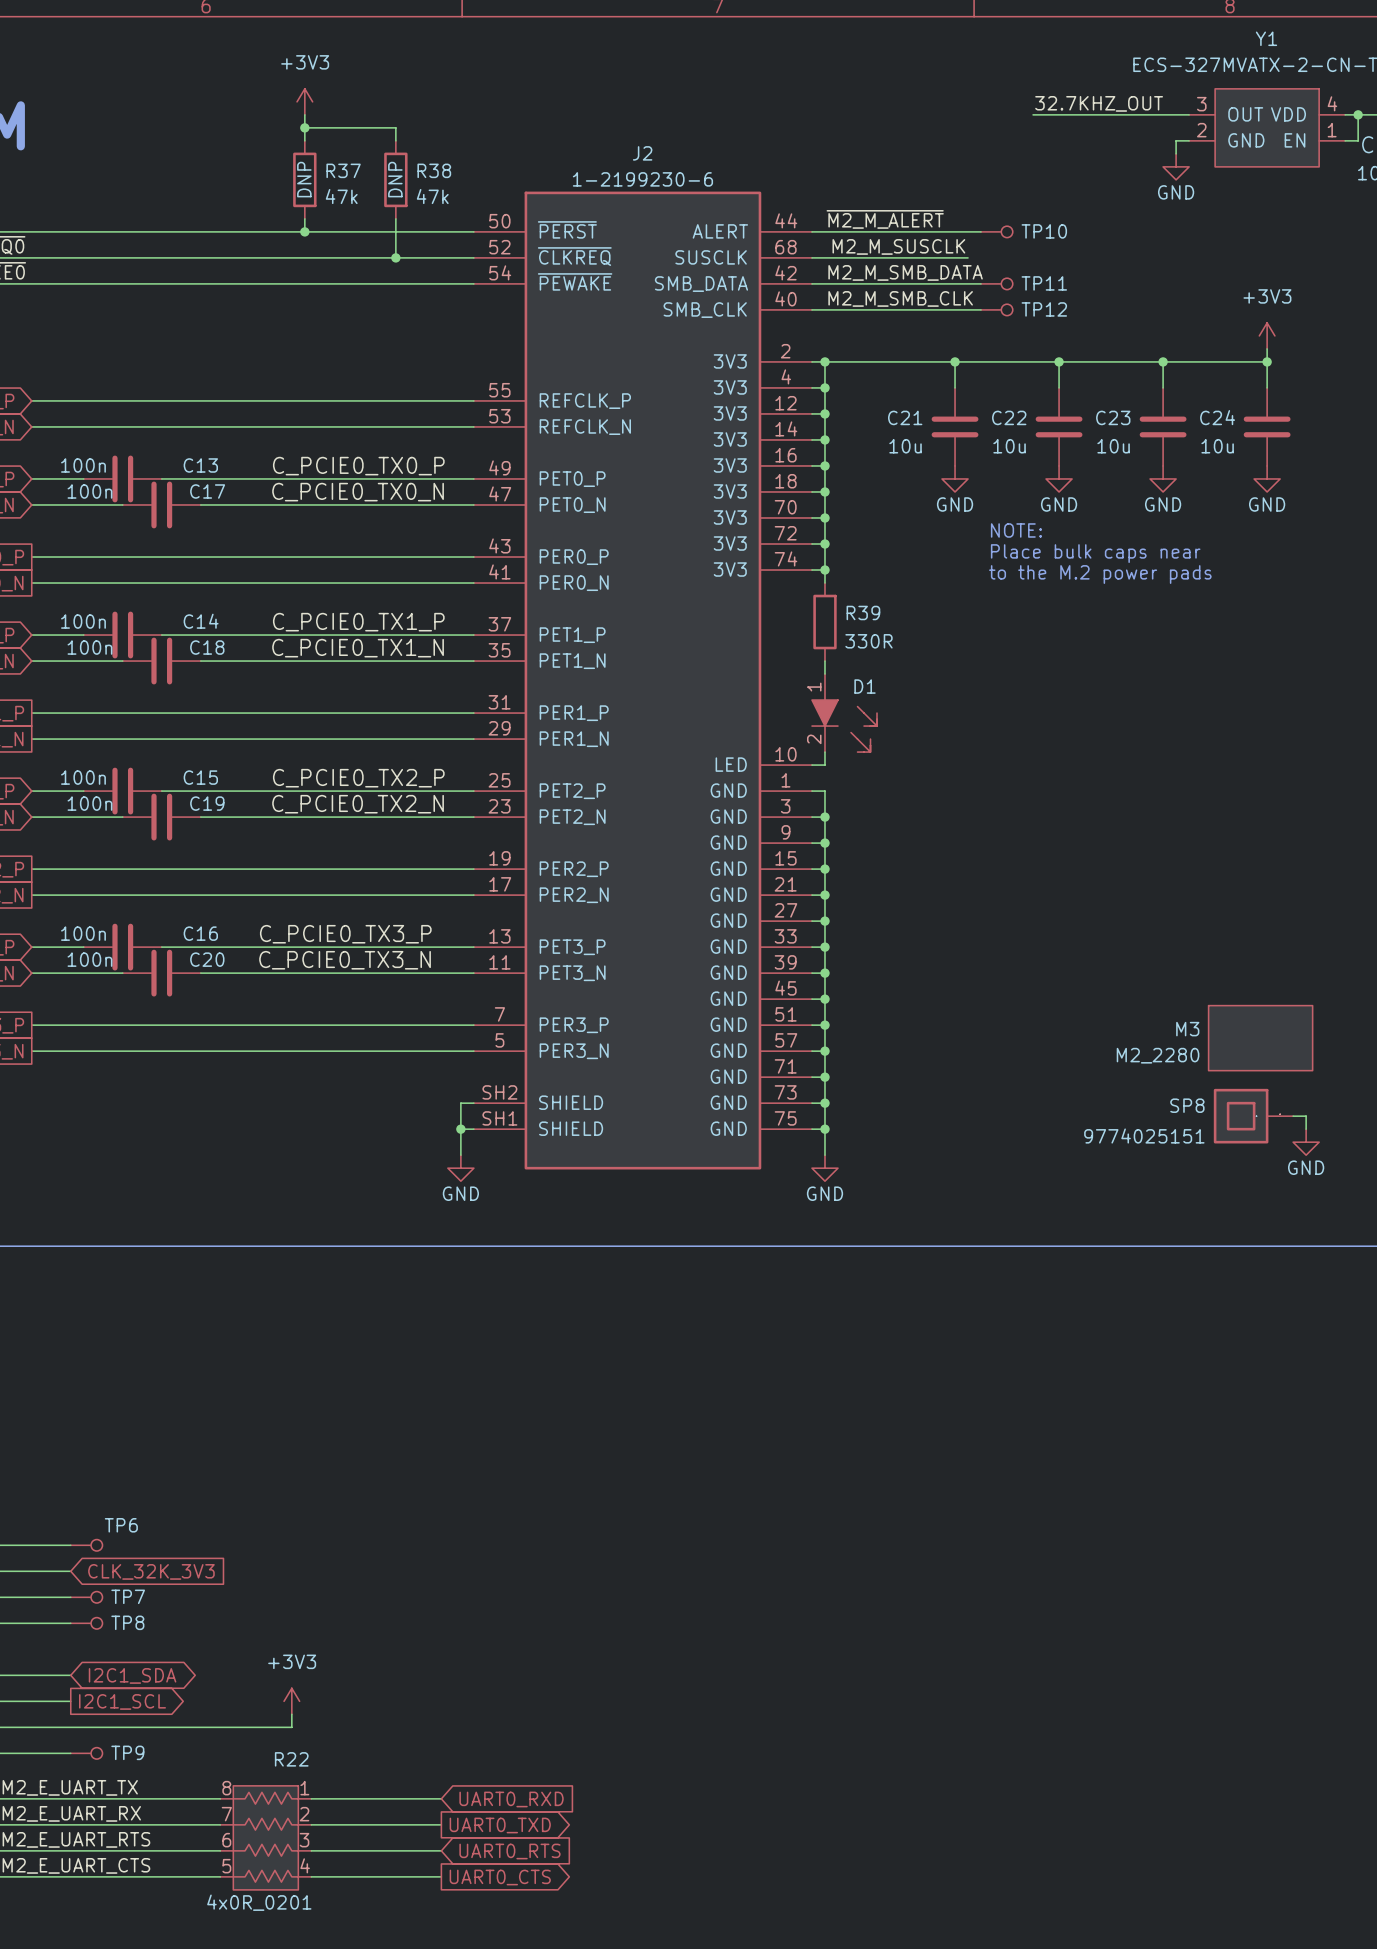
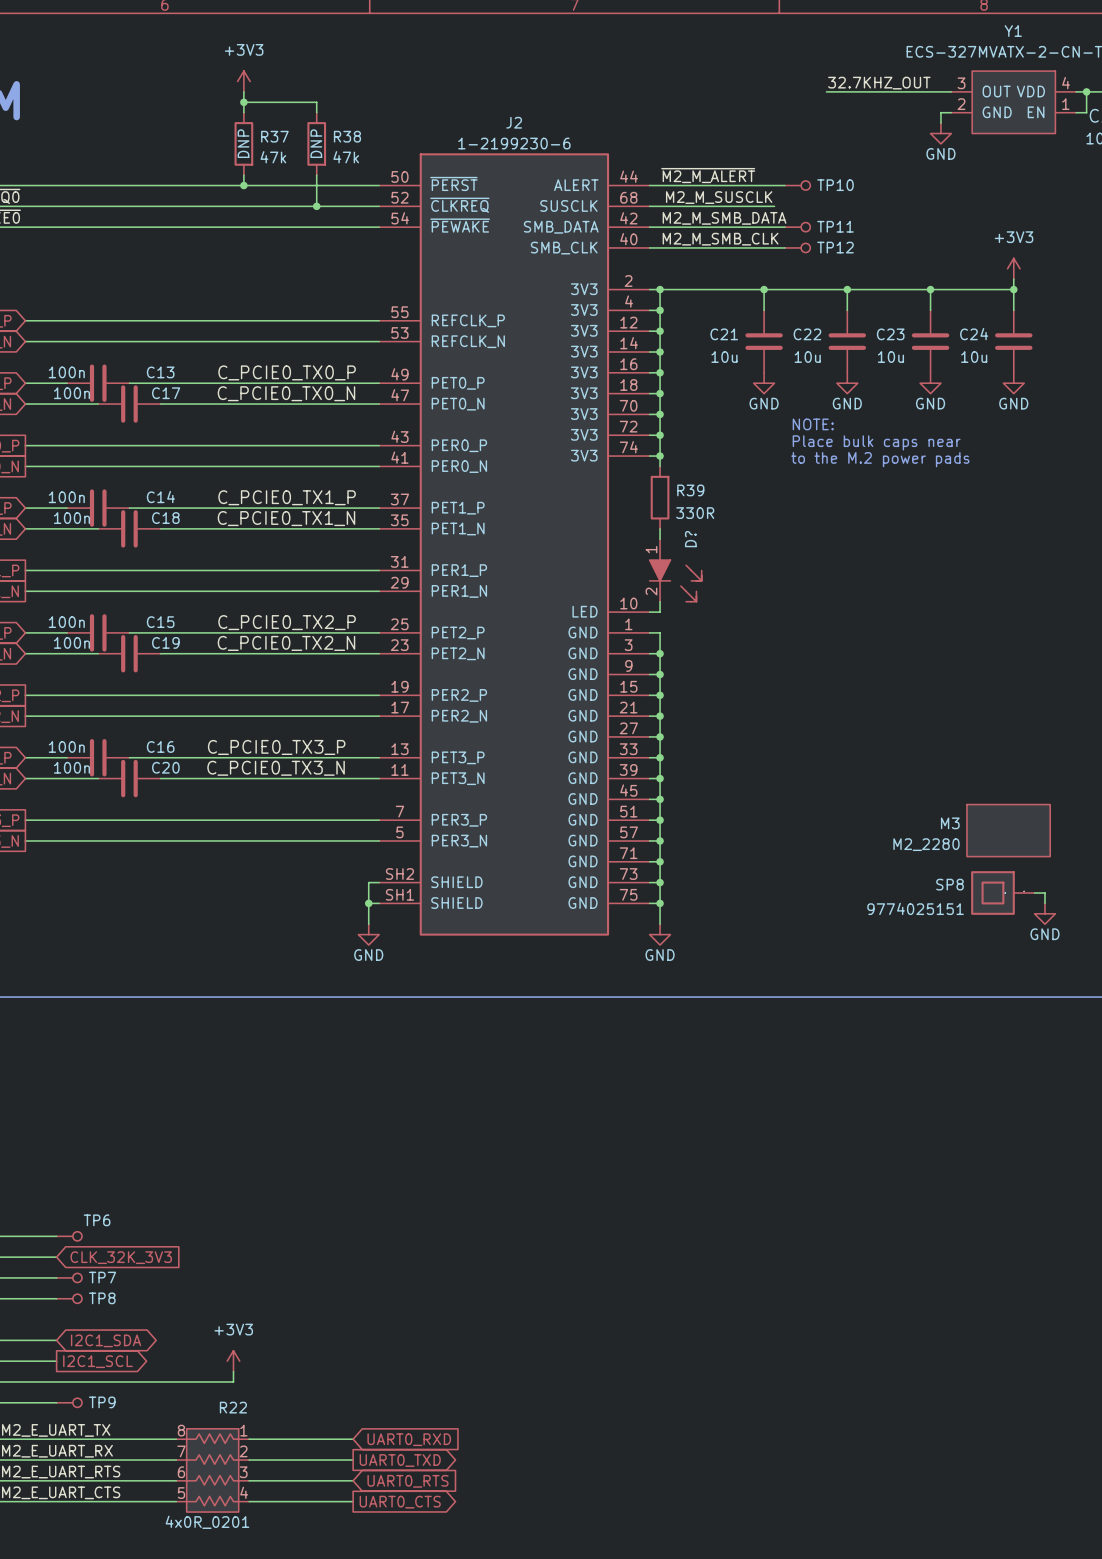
D1 name: D1 (865, 686) -> D? (690, 539)

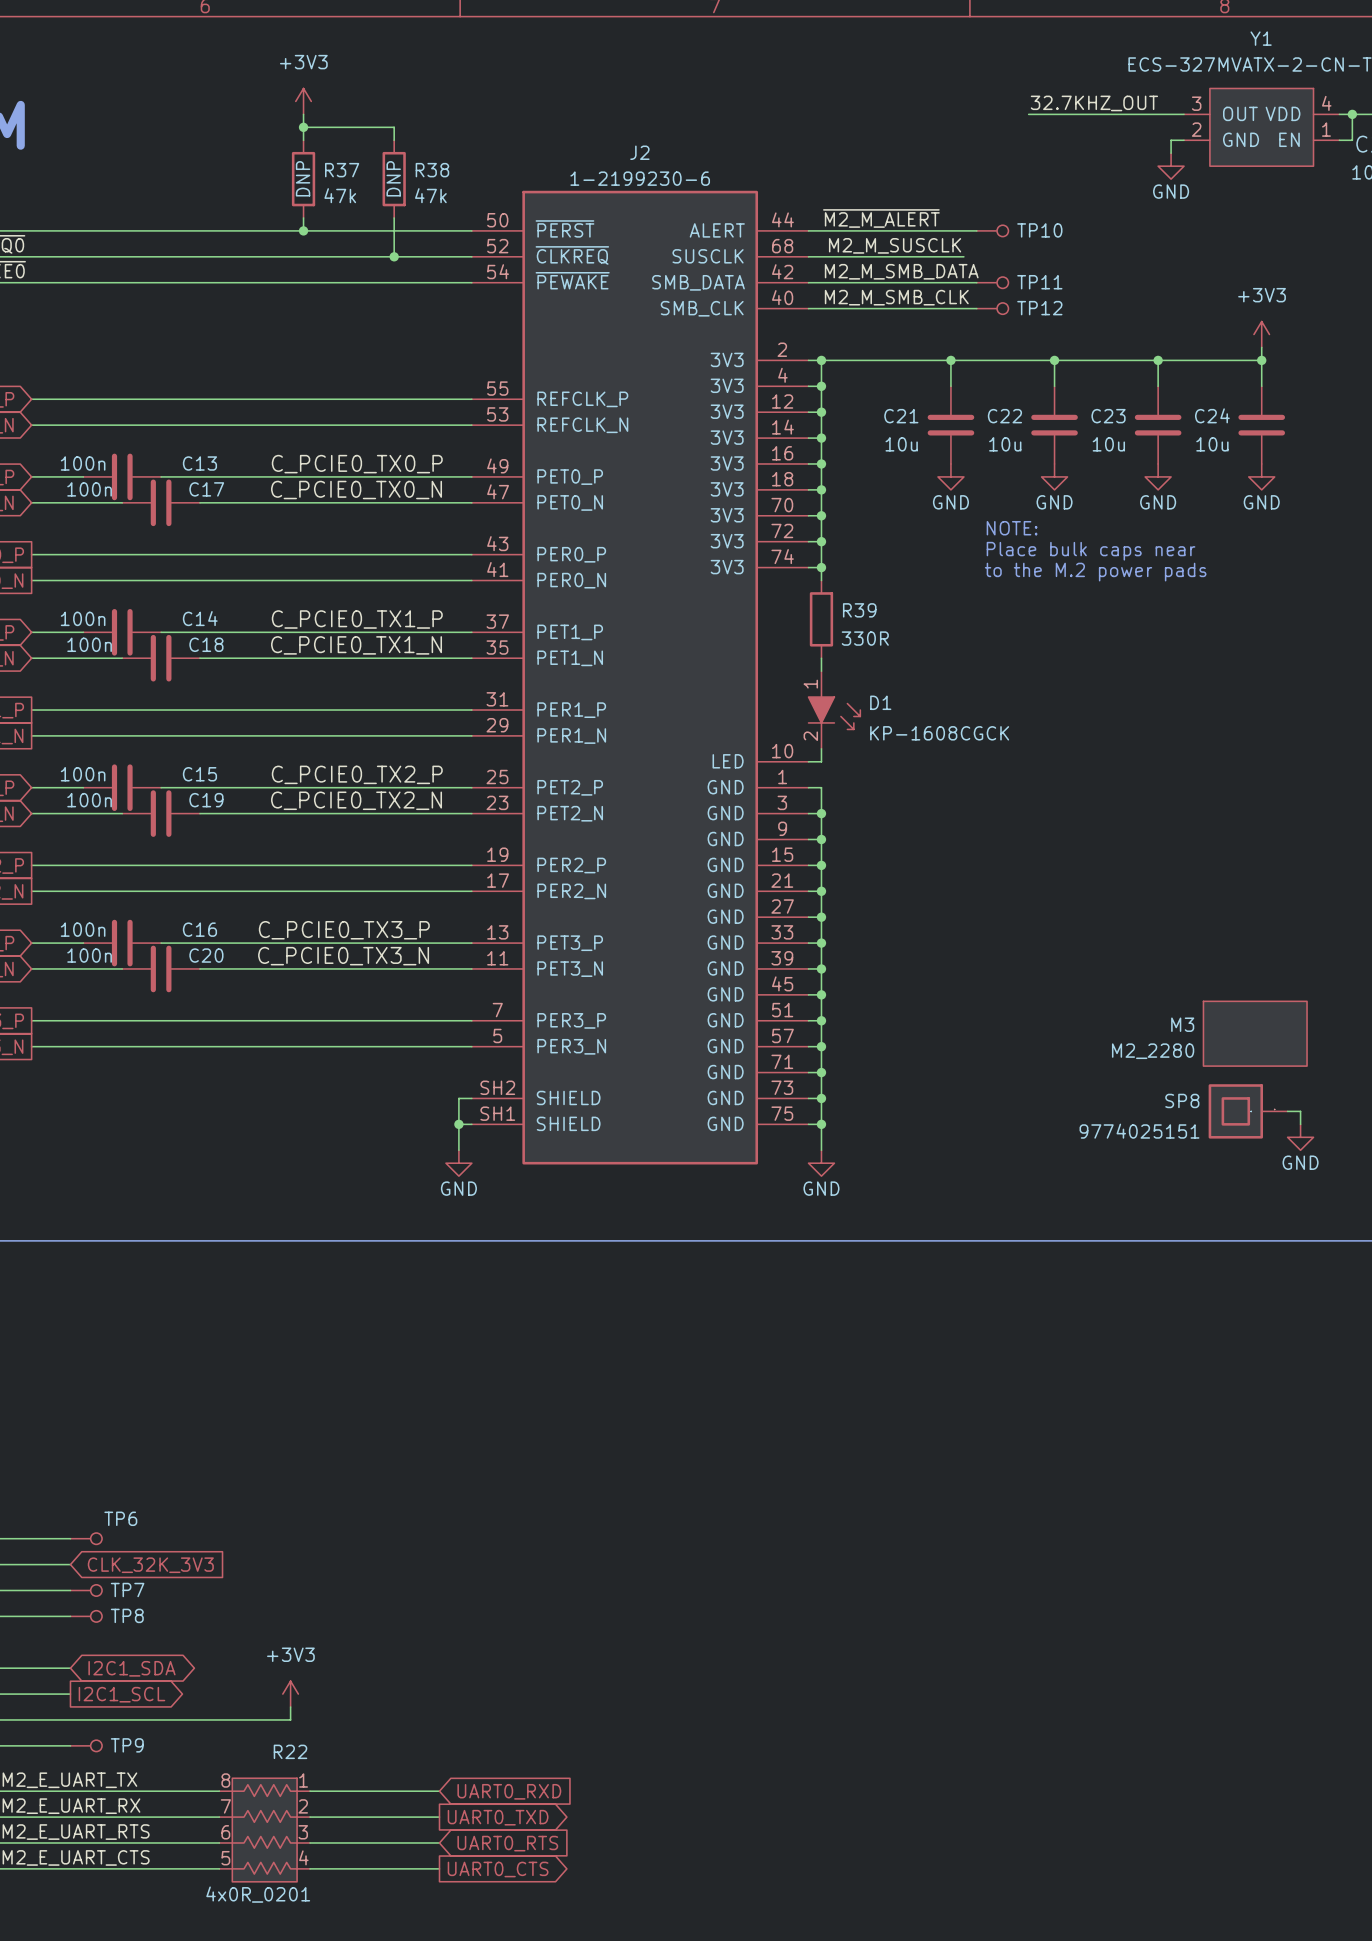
D1: none -> KP-1608CGCK (834, 710)
D?: (675, 570) -> none

